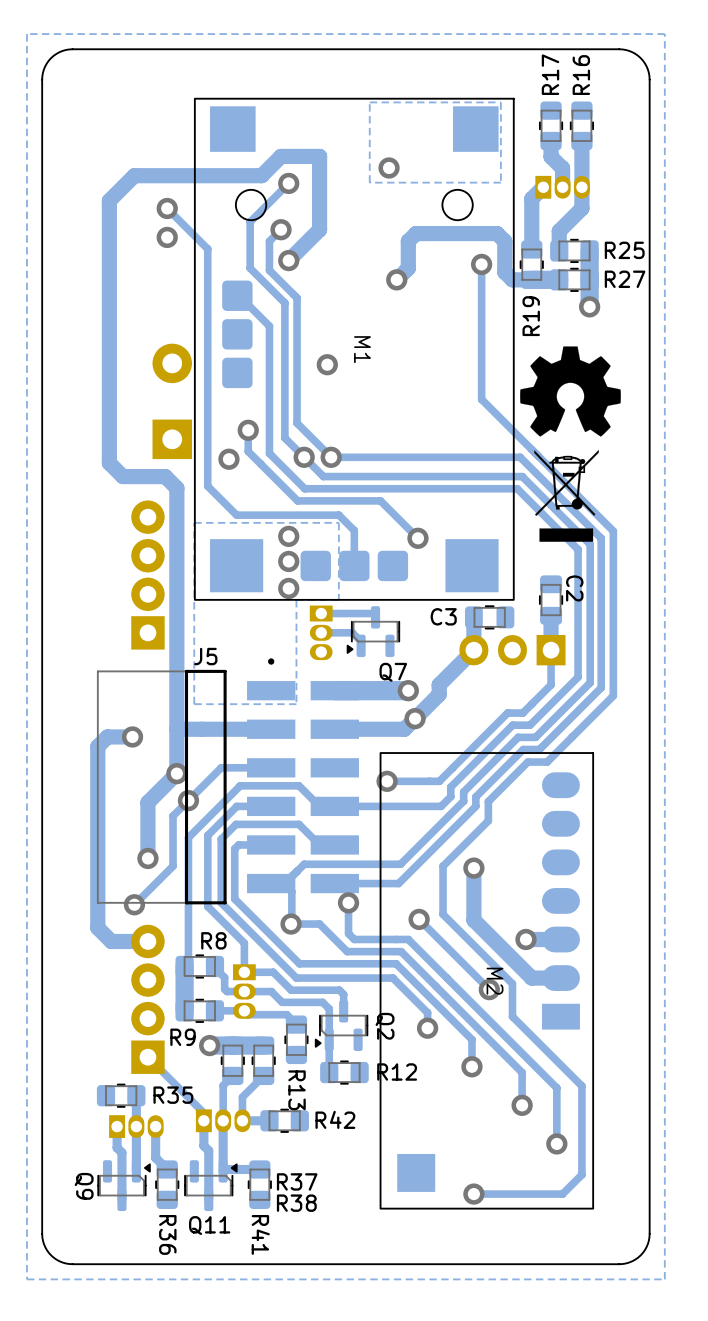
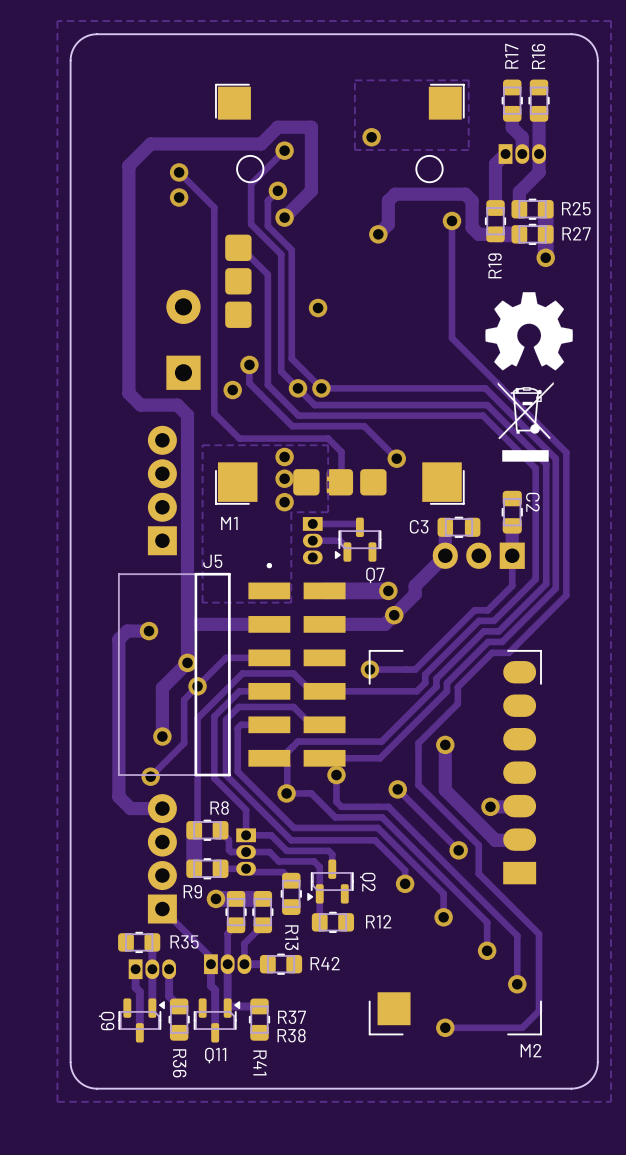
M1 footprint: [194, 97, 515, 601] -> [215, 84, 465, 505]
M1 name position: M1 (362, 349) -> M1 (229, 523)
M2 footprint: [379, 752, 594, 1210] -> [369, 650, 542, 1036]
M2 name position: M2 (495, 981) -> M2 (531, 1050)

